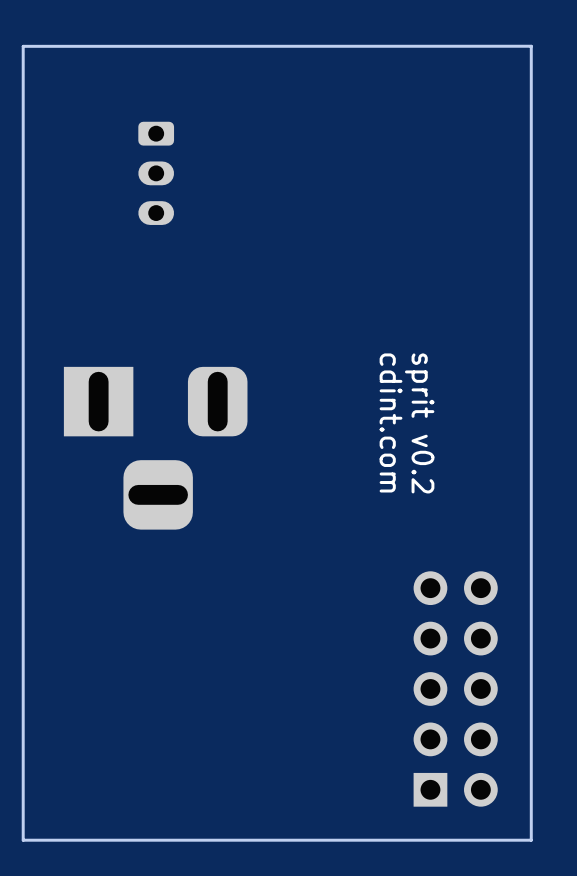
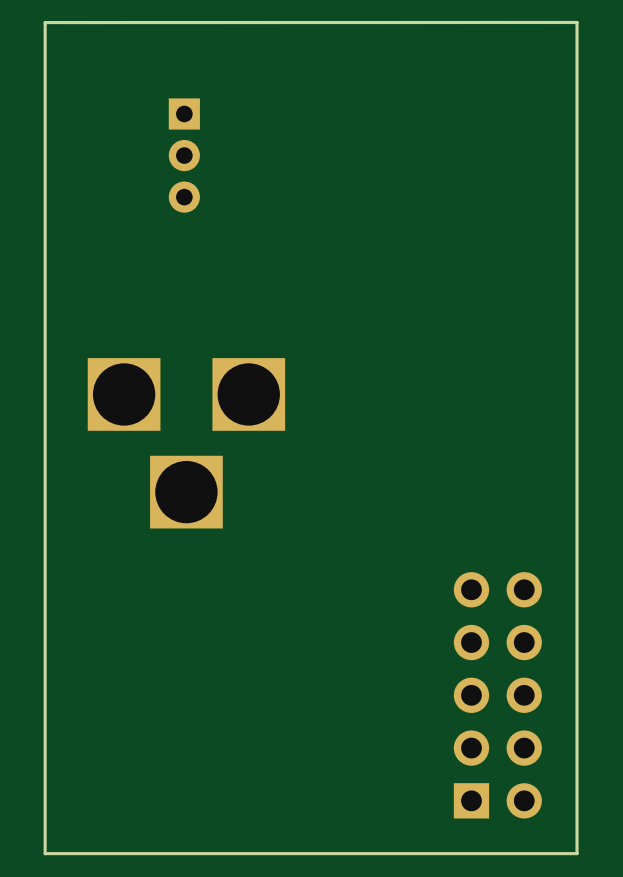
part footprint: [138, 121, 175, 225] -> [168, 98, 200, 213]
part footprint: [63, 366, 248, 530] -> [87, 358, 286, 529]
text: cdint.com (391, 422) -> none
text: sprit v0.2 (419, 423) -> none

